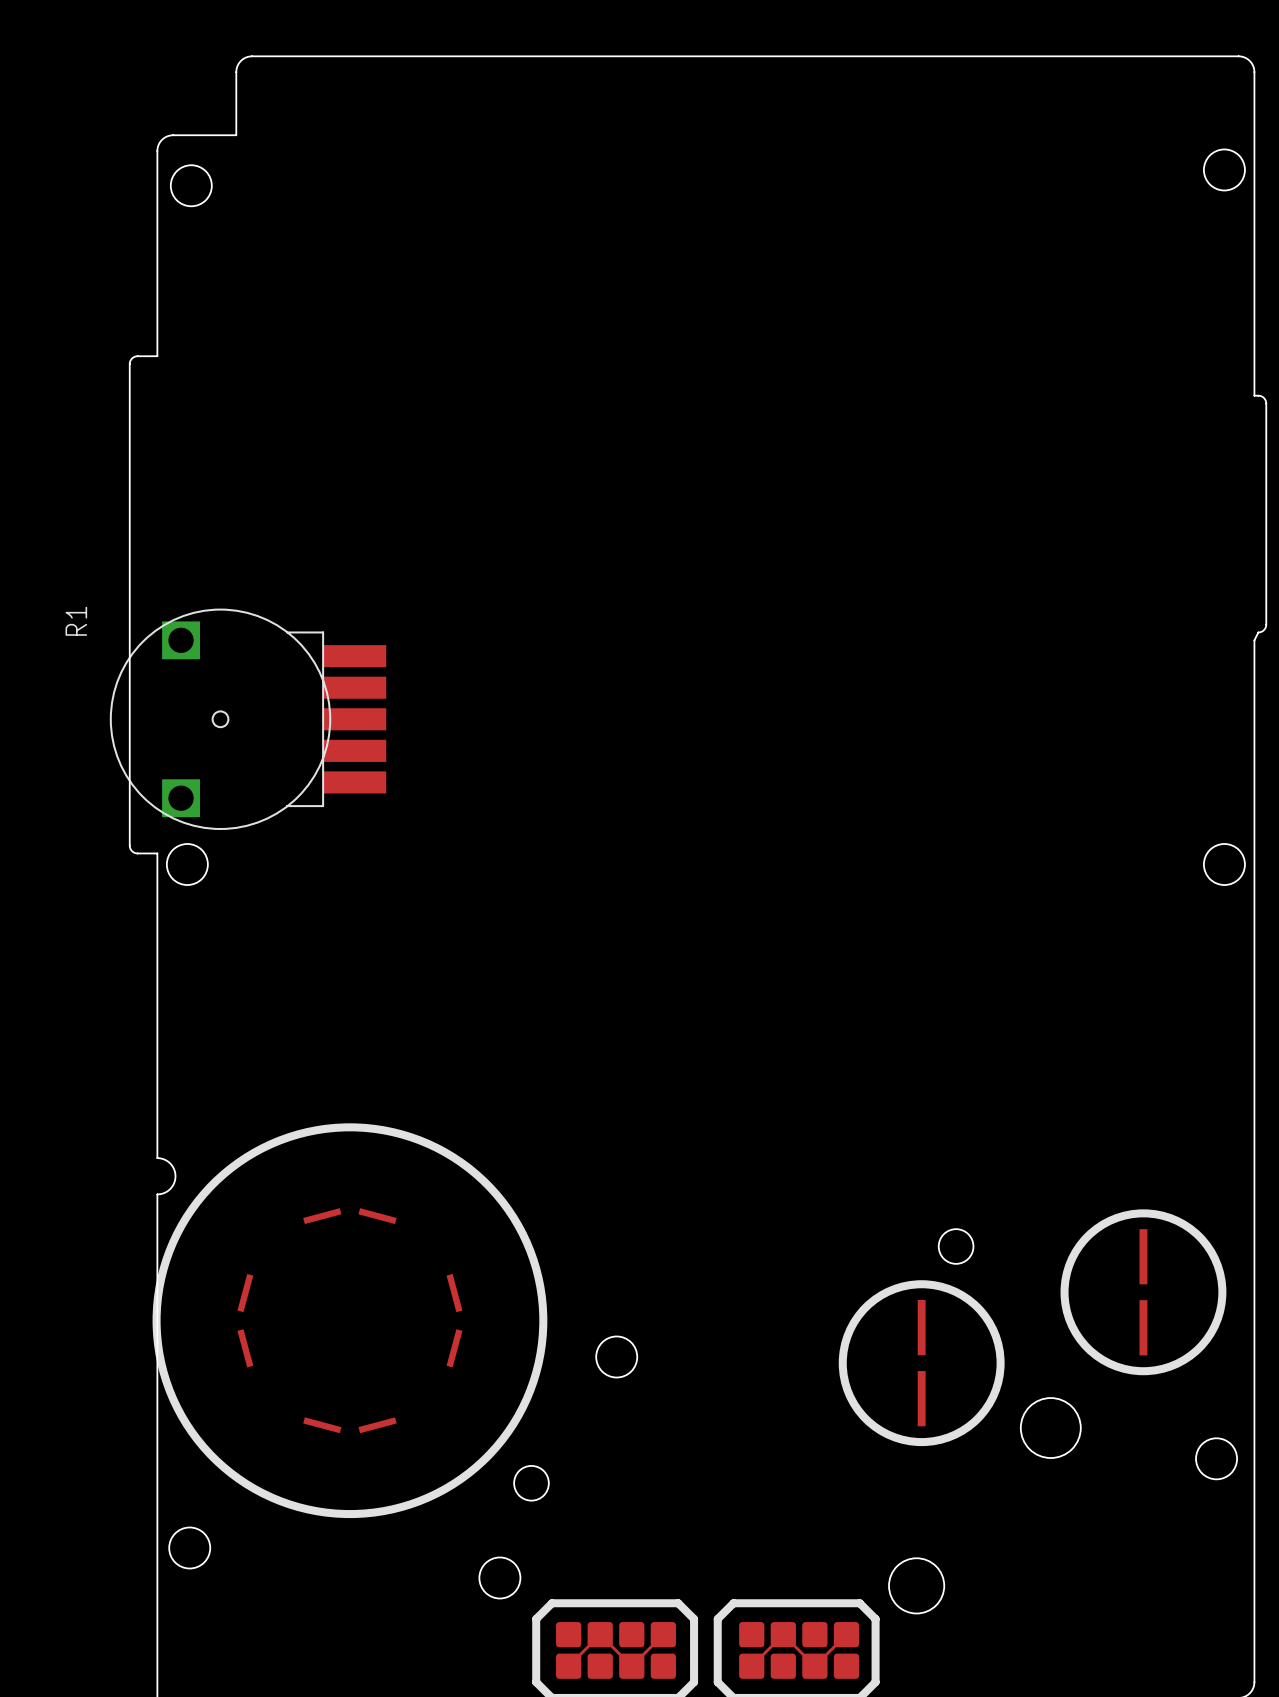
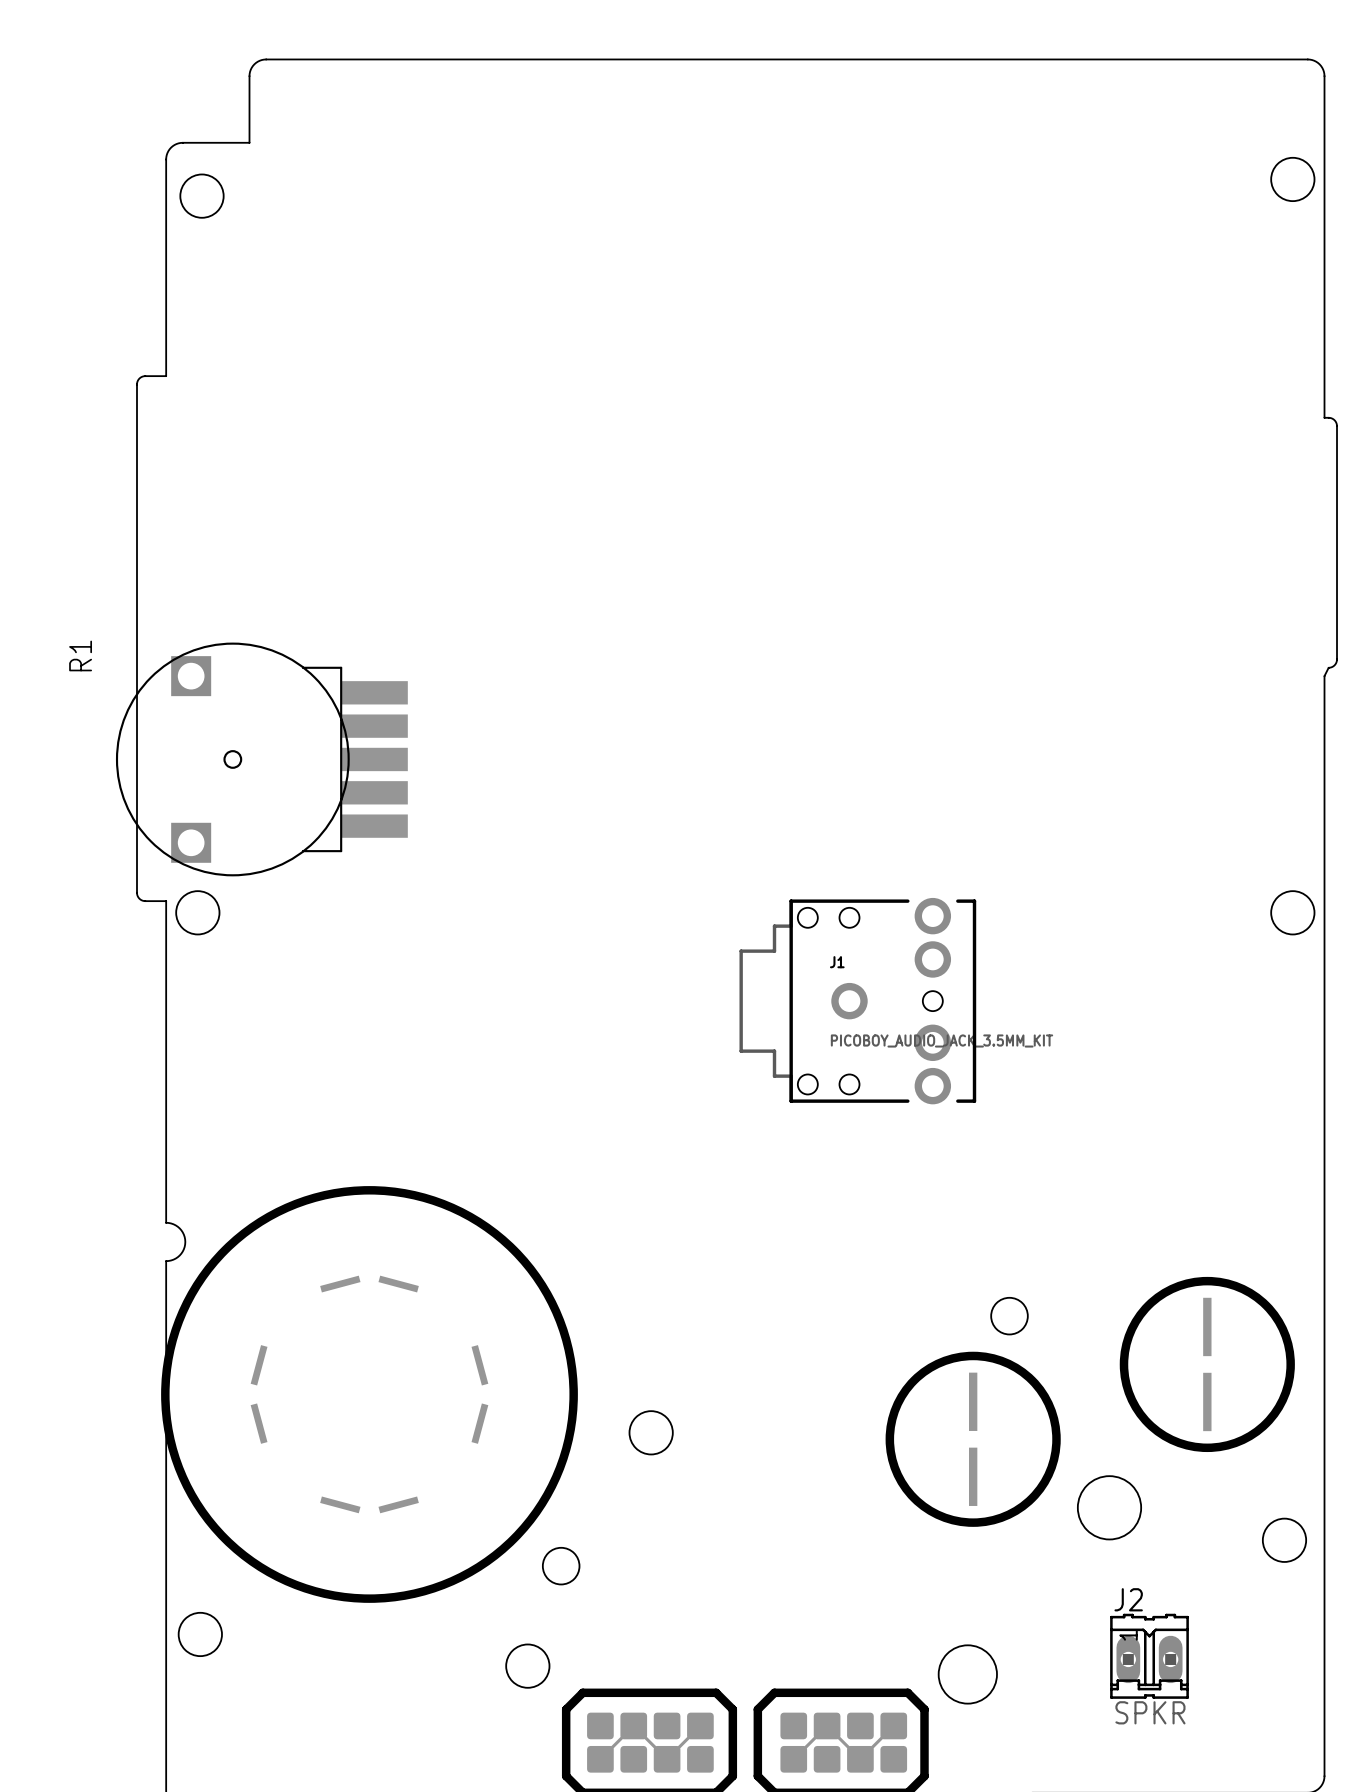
J1: none -> PICOBOY_AUDIO_JACK_3.5MM_KIT (857, 1001)
J2: none -> SPKR (1149, 1656)

